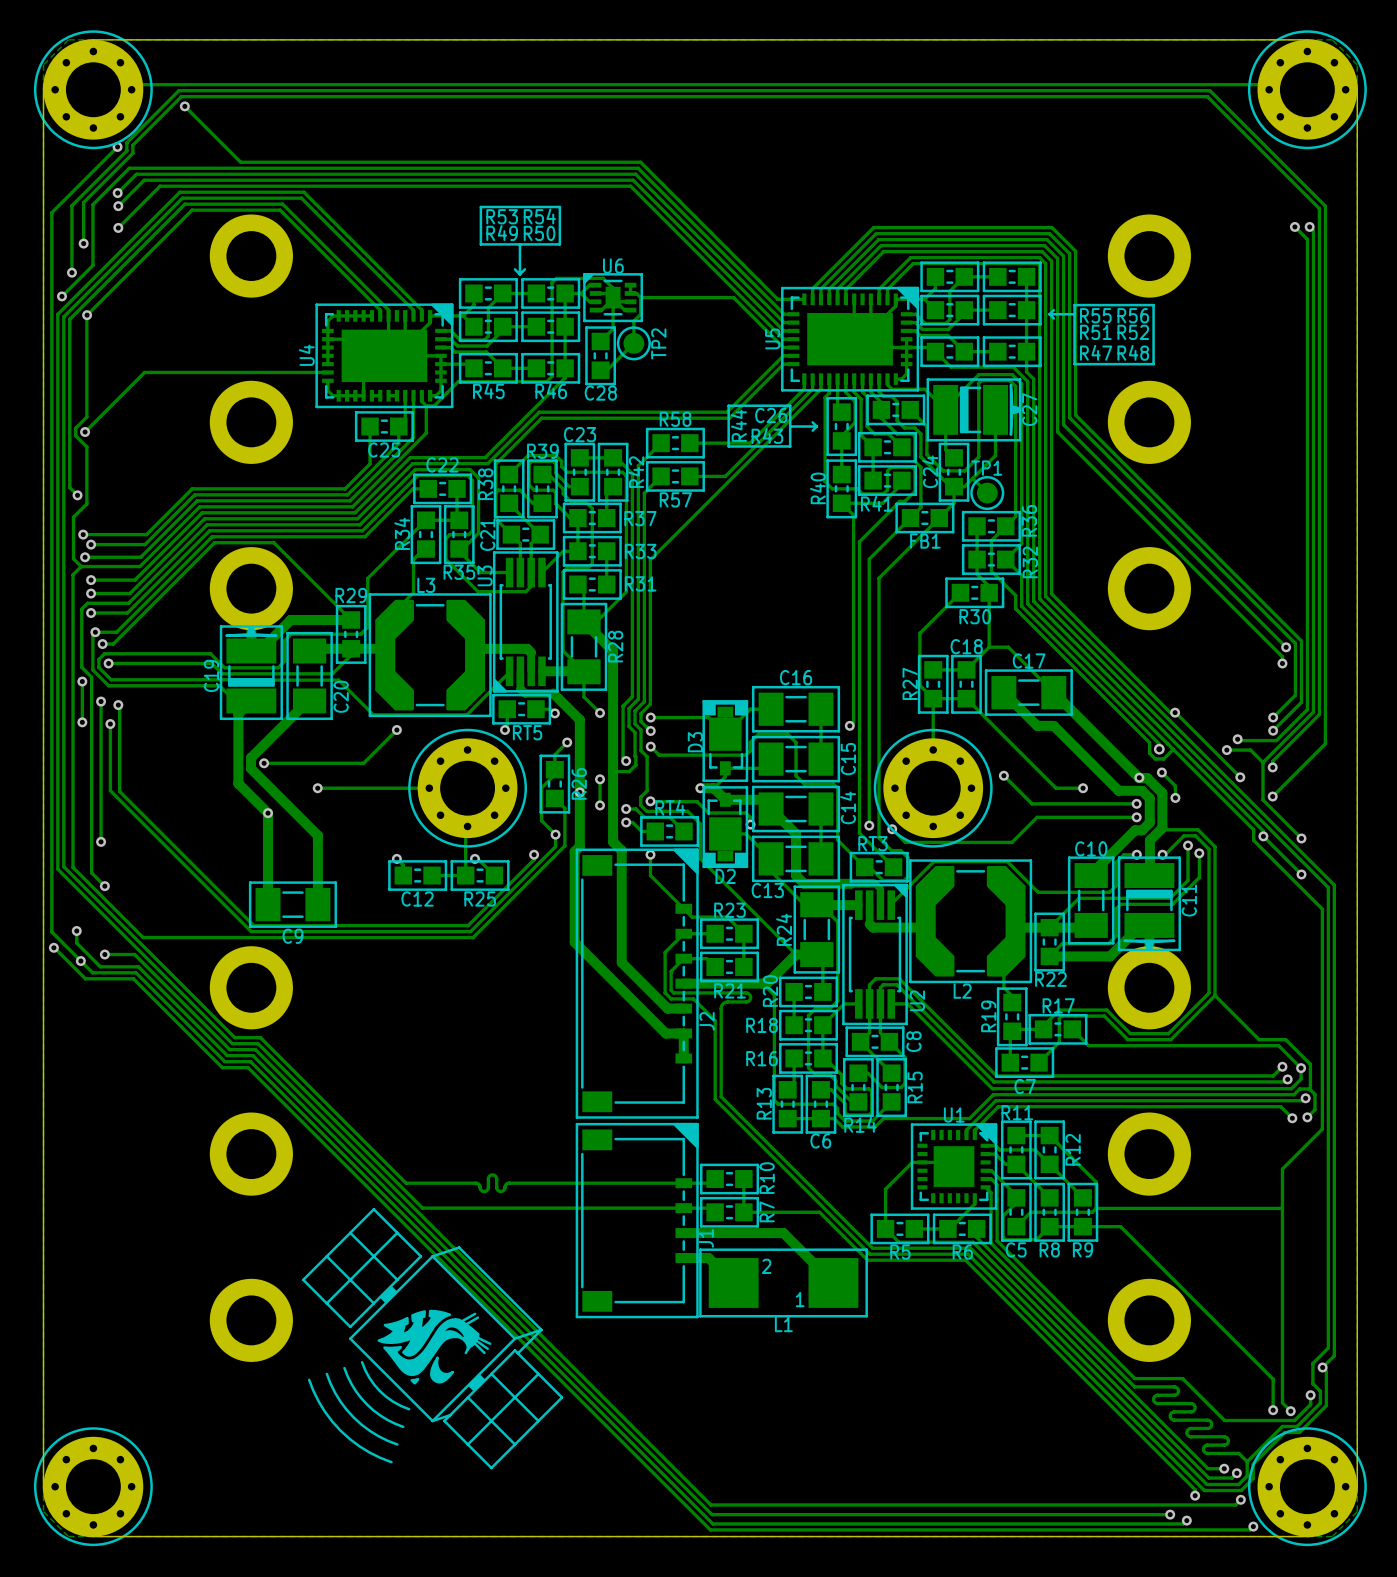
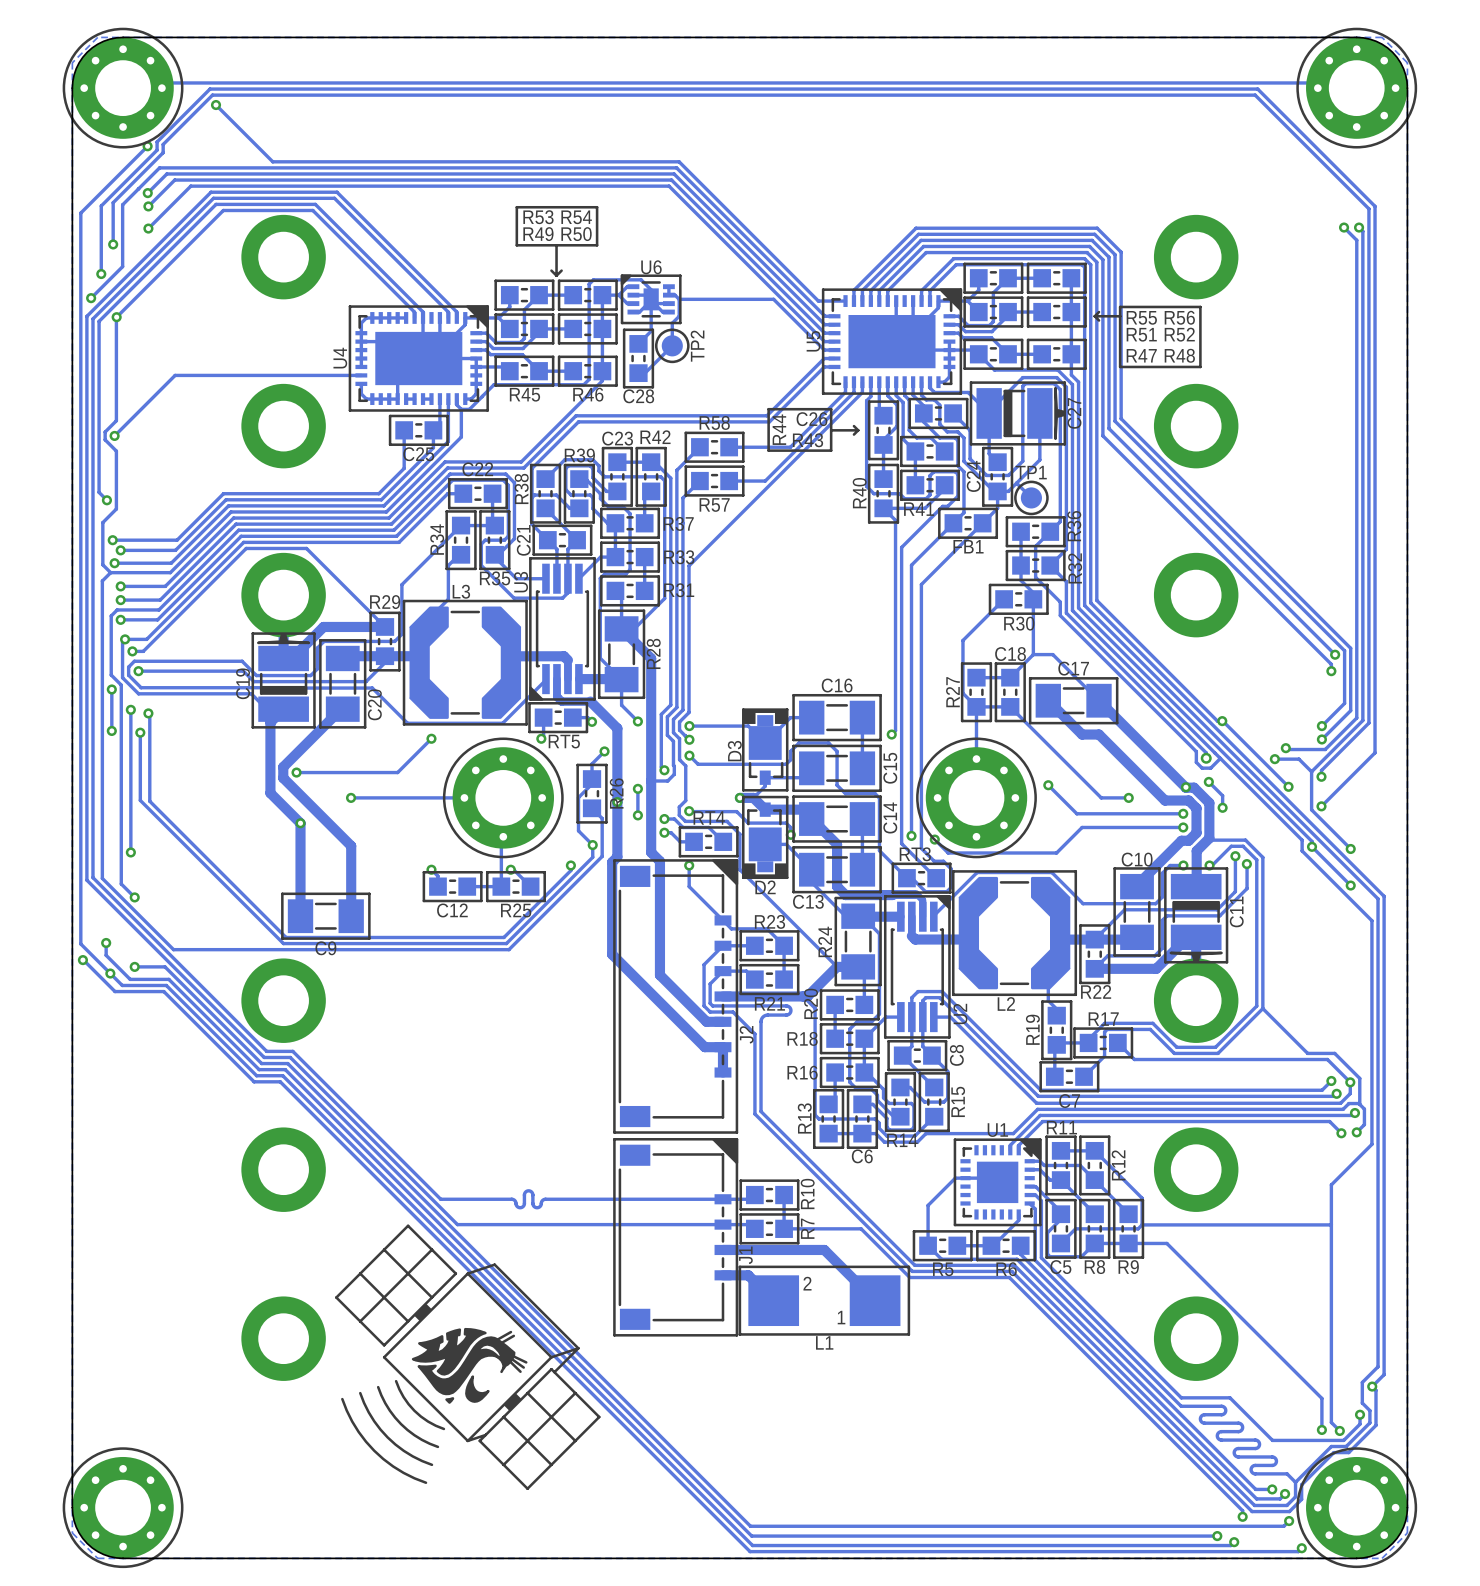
R42 name rotation: 0° (636, 472) -> 90° clockwise (655, 437)
R42 name position: R42 (636, 472) -> R42 (655, 437)

